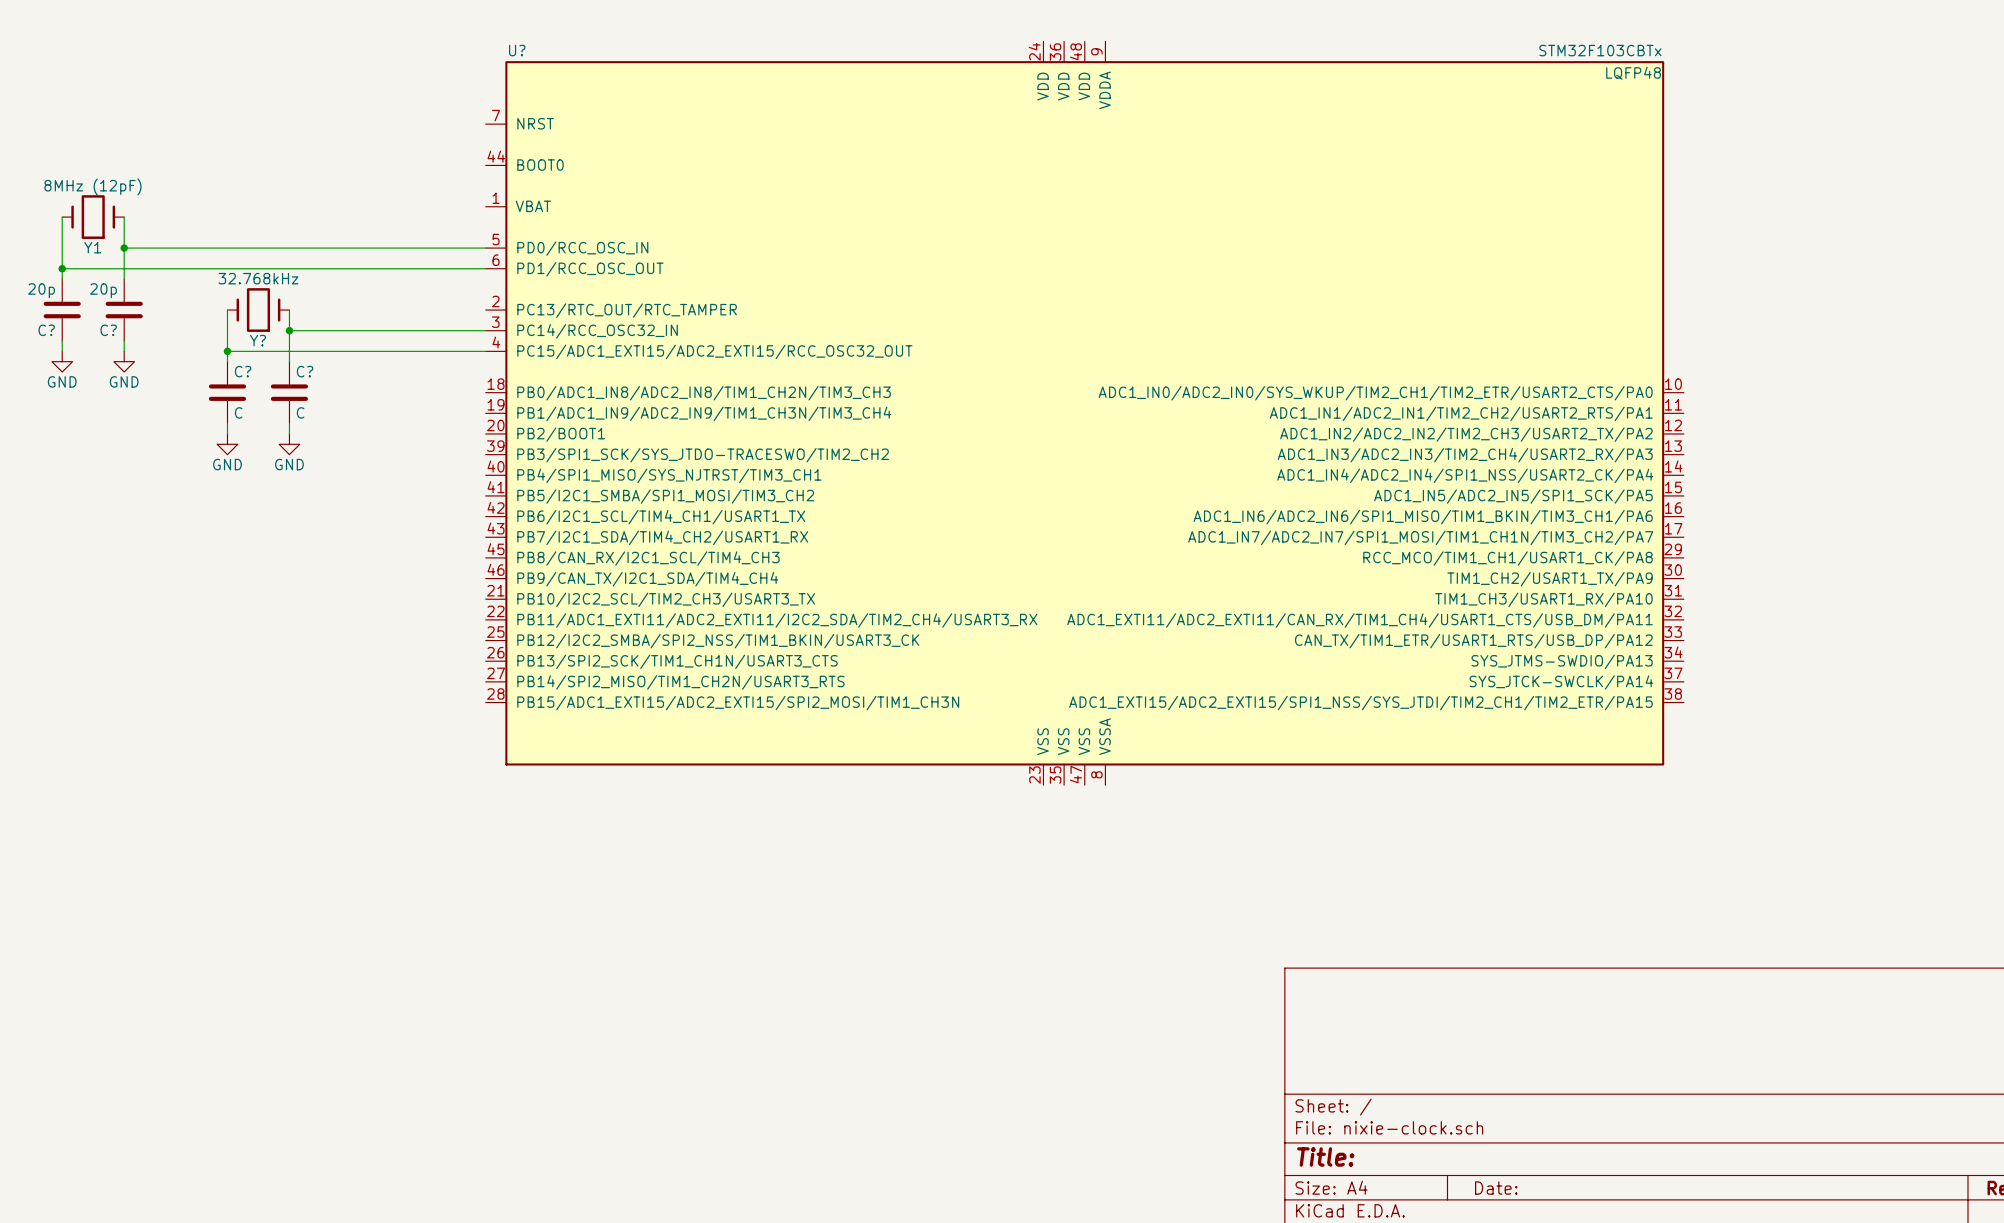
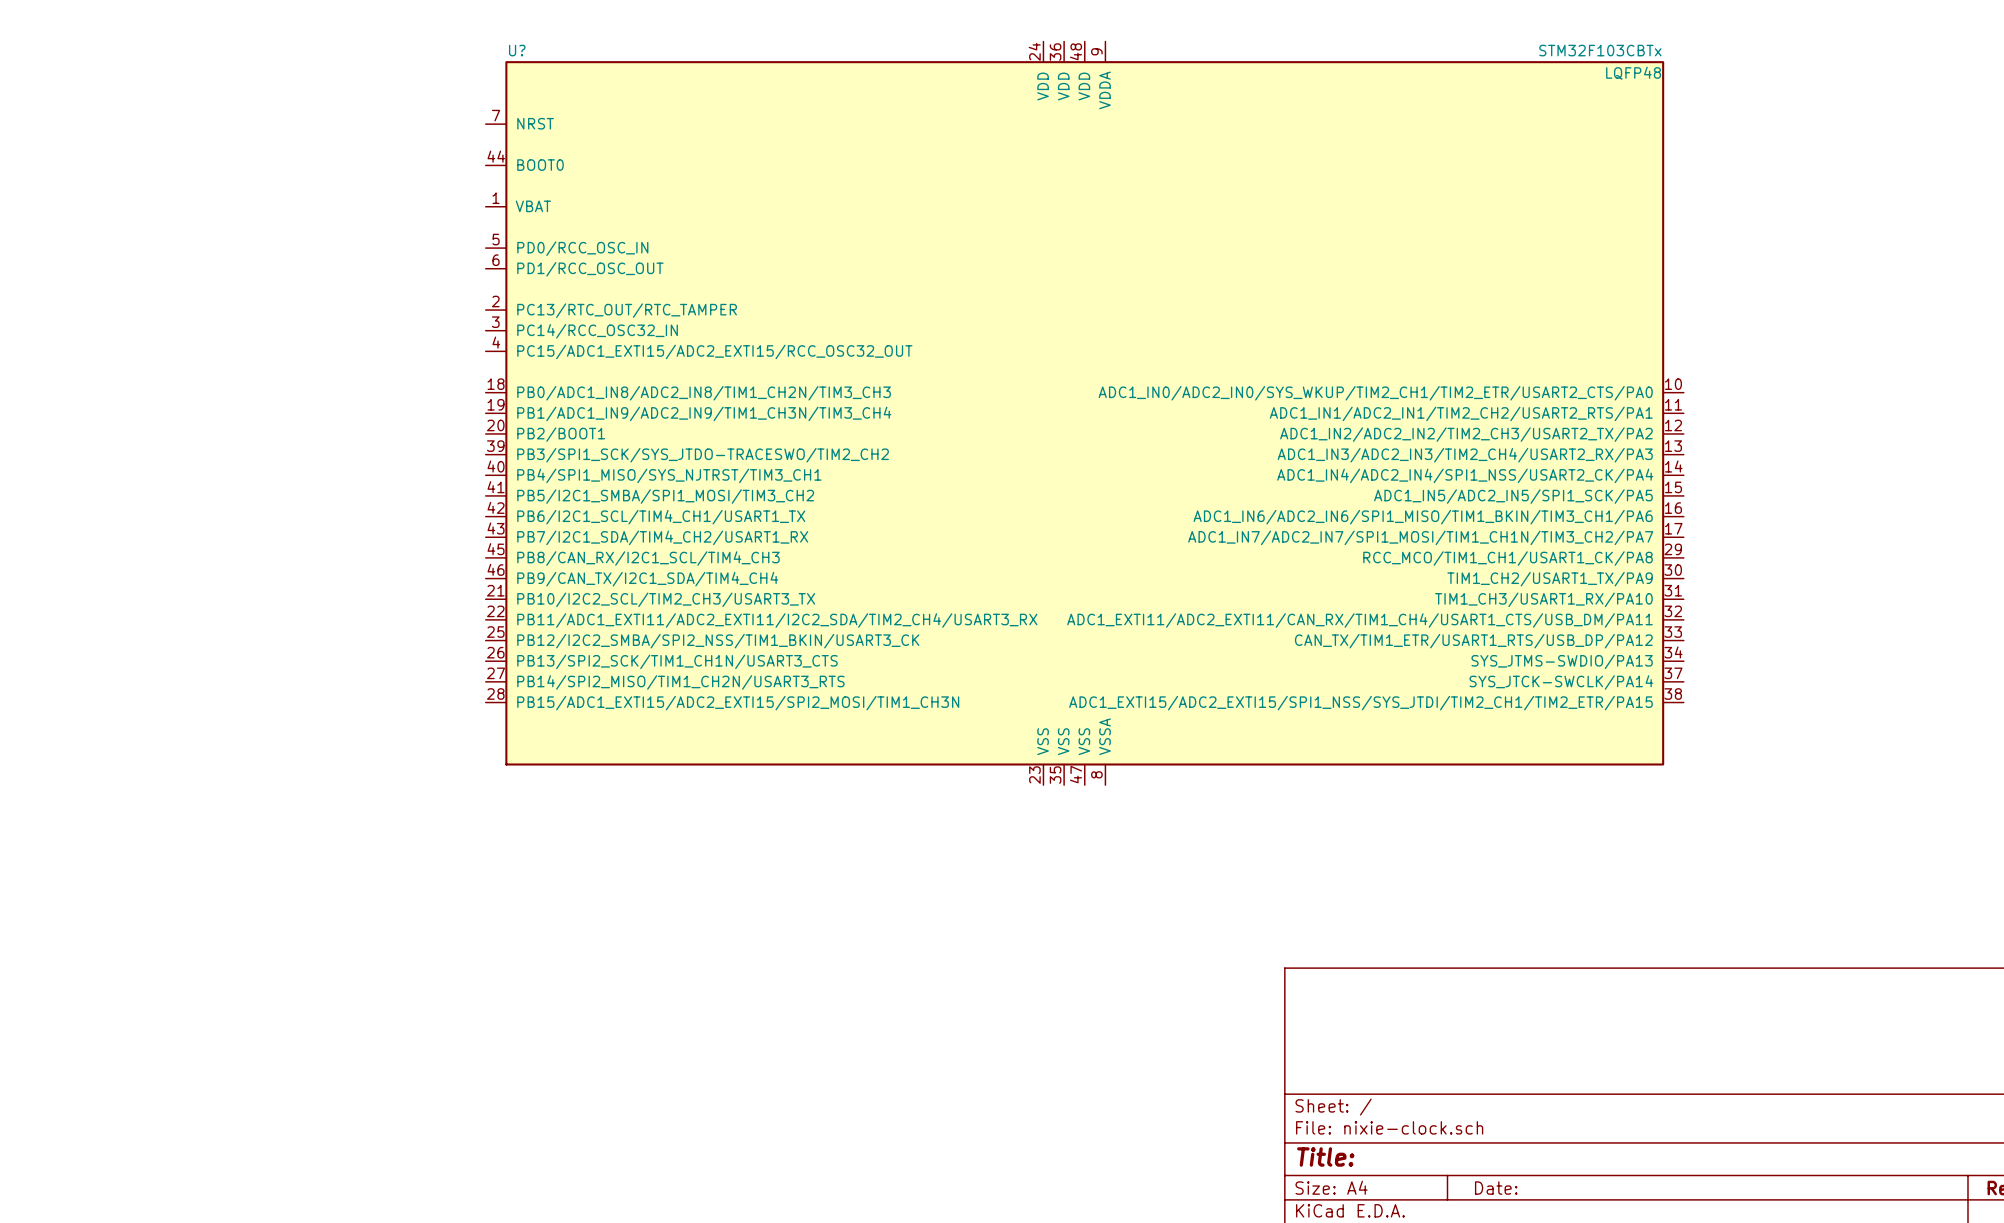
wire: (62, 217) (62, 279) -> none
Y1: 8MHz (12pF) (93, 217) -> none
wire: (124, 217) (124, 279) -> none
wire: (124, 248) (485, 248) -> none
junction: (124, 248) -> none
wire: (62, 268) (485, 268) -> none
junction: (62, 268) -> none
C?: 20p (62, 310) -> none
C?: 20p (124, 310) -> none
wire: (227, 310) (227, 361) -> none
Y?: 32.768kHz (258, 310) -> none
wire: (289, 310) (289, 361) -> none
wire: (289, 330) (485, 330) -> none
junction: (289, 330) -> none
wire: (62, 341) (62, 351) -> none
wire: (124, 341) (124, 351) -> none
wire: (227, 351) (485, 351) -> none
junction: (227, 351) -> none
power symbol: GND (62, 361) -> none
power symbol: GND (124, 361) -> none
C?: C (227, 392) -> none
C?: C (289, 392) -> none
wire: (227, 423) (227, 433) -> none
wire: (289, 423) (289, 433) -> none
power symbol: GND (227, 444) -> none
power symbol: GND (289, 444) -> none

